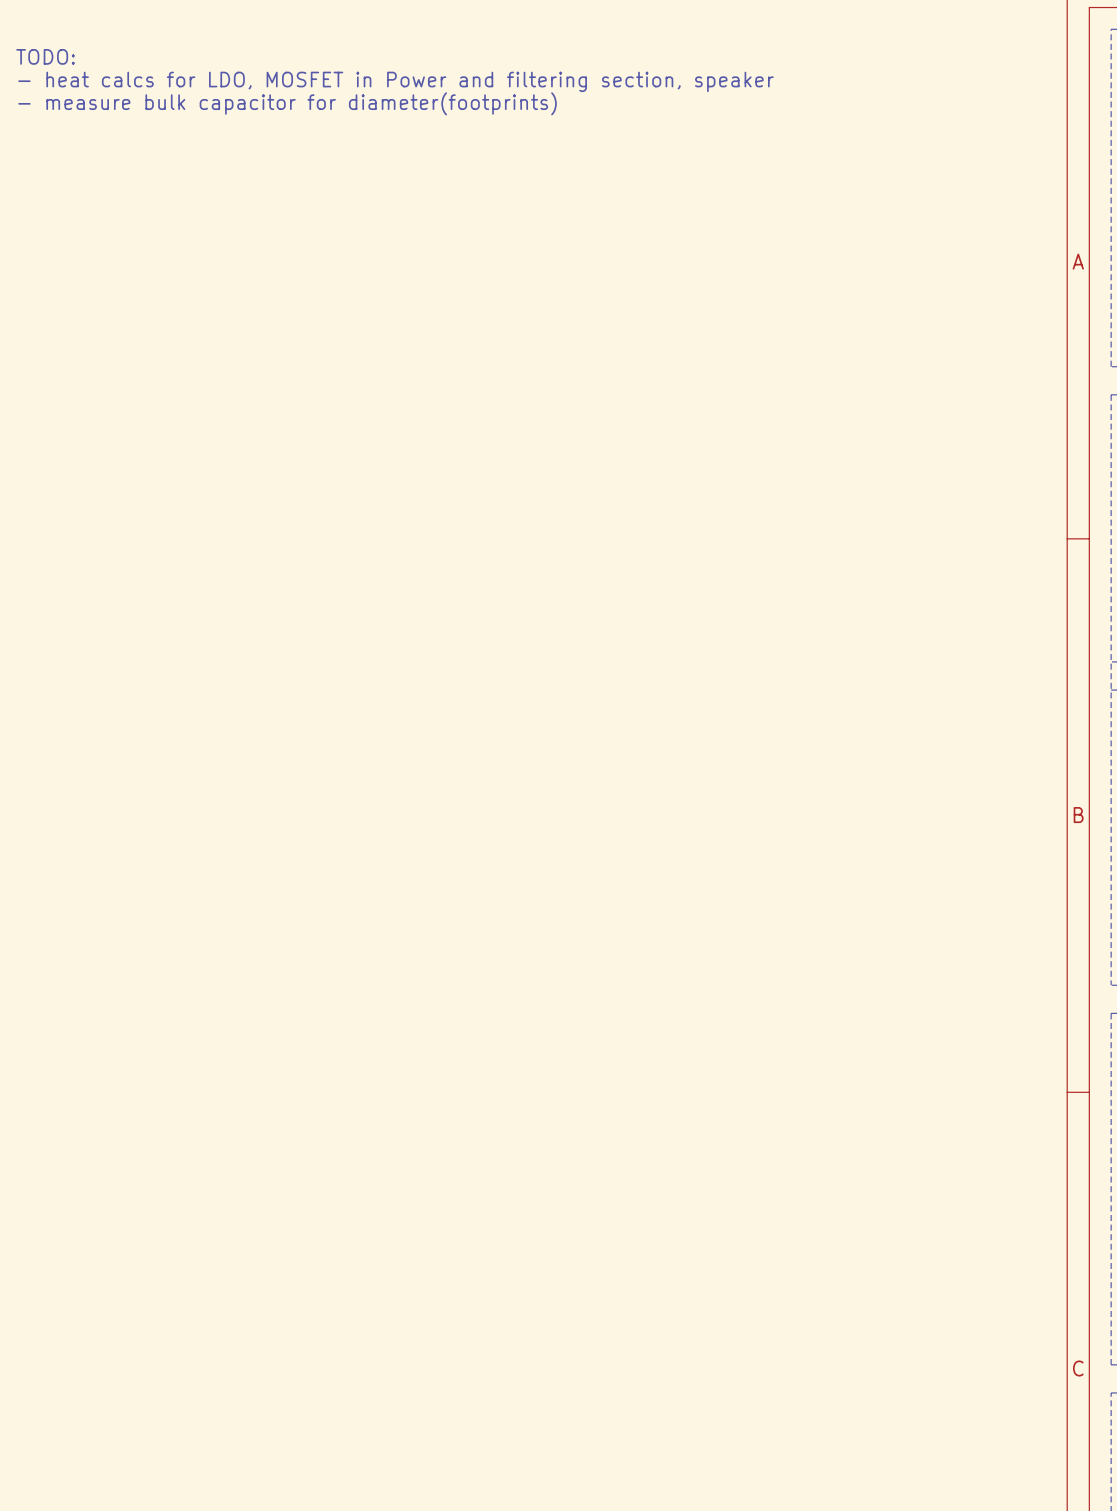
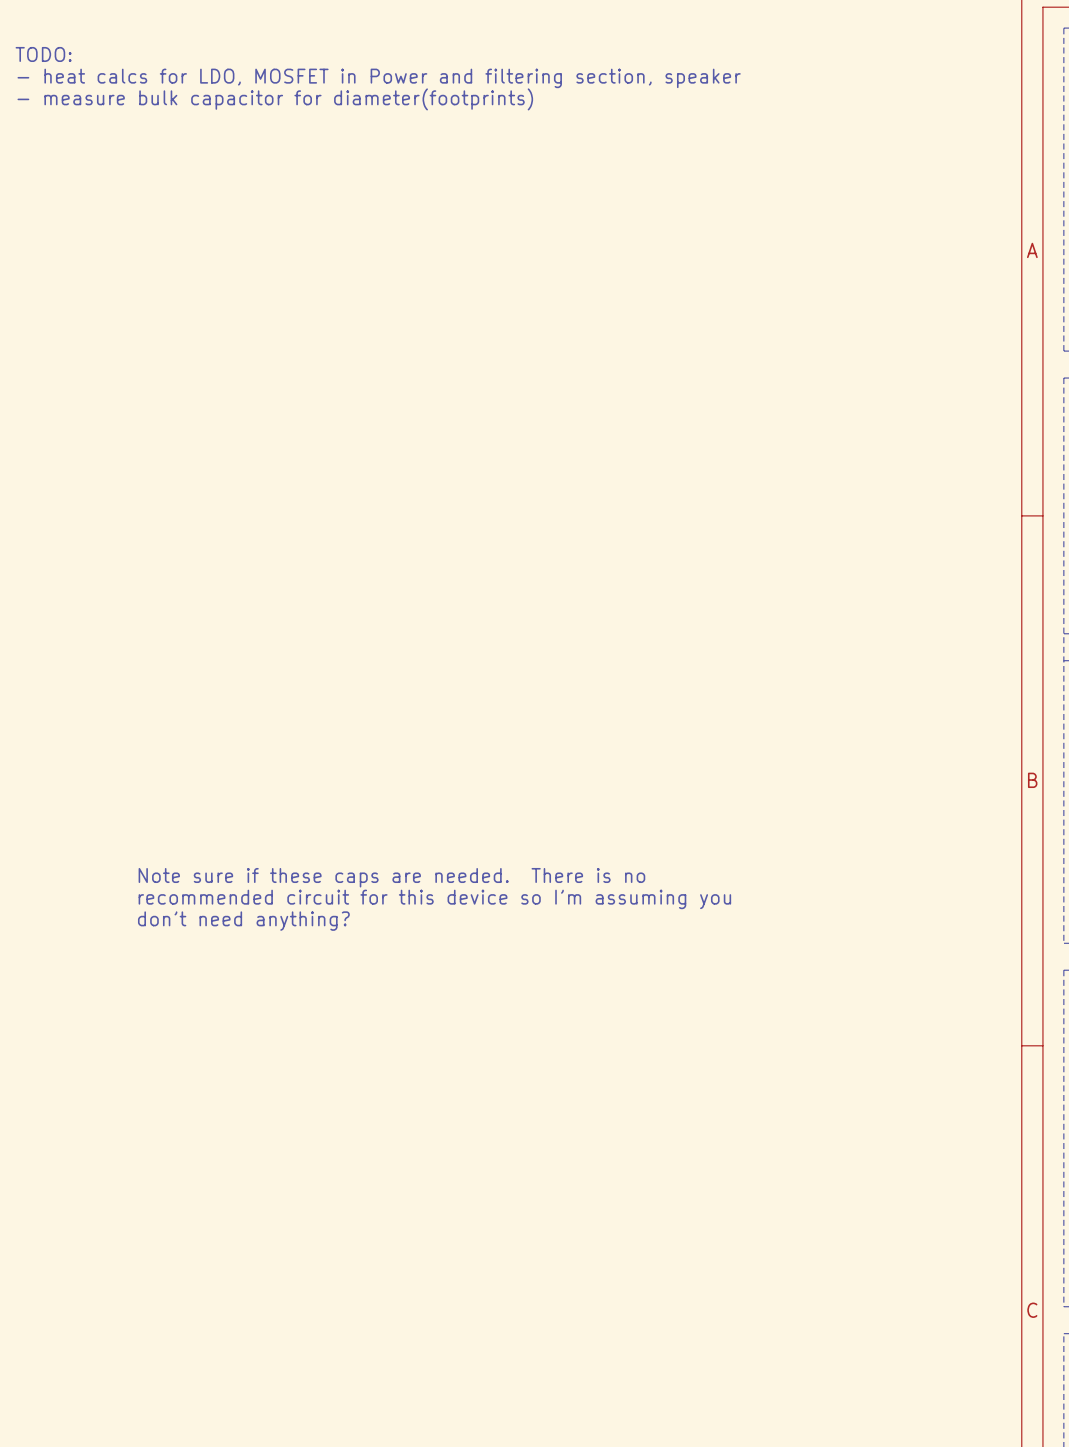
text: none -> Note sure if these caps are needed. There is no (391, 877)
text: none -> recommended circuit for this device so I’m assuming you (434, 899)
text: none -> don’t need anything? (243, 921)

